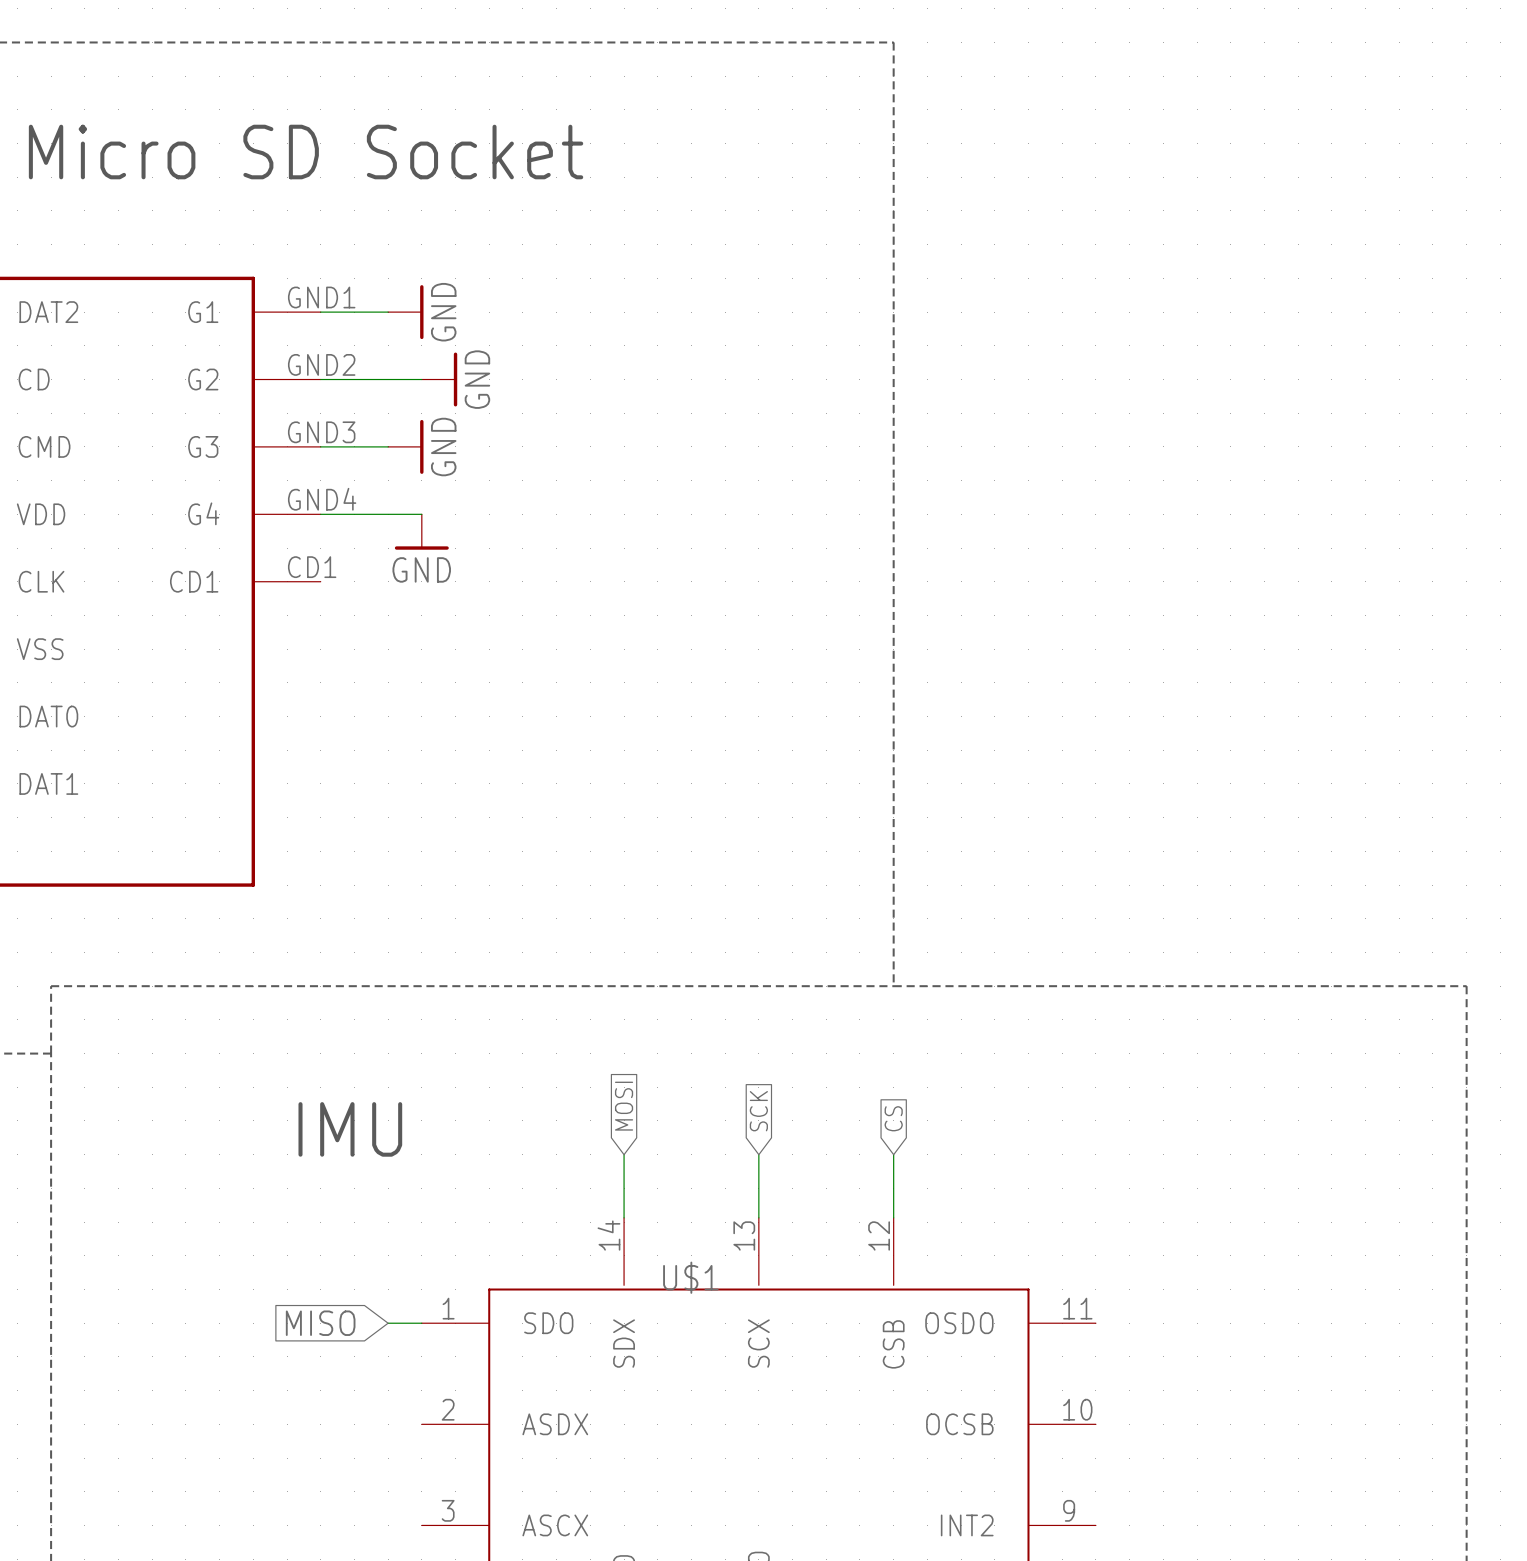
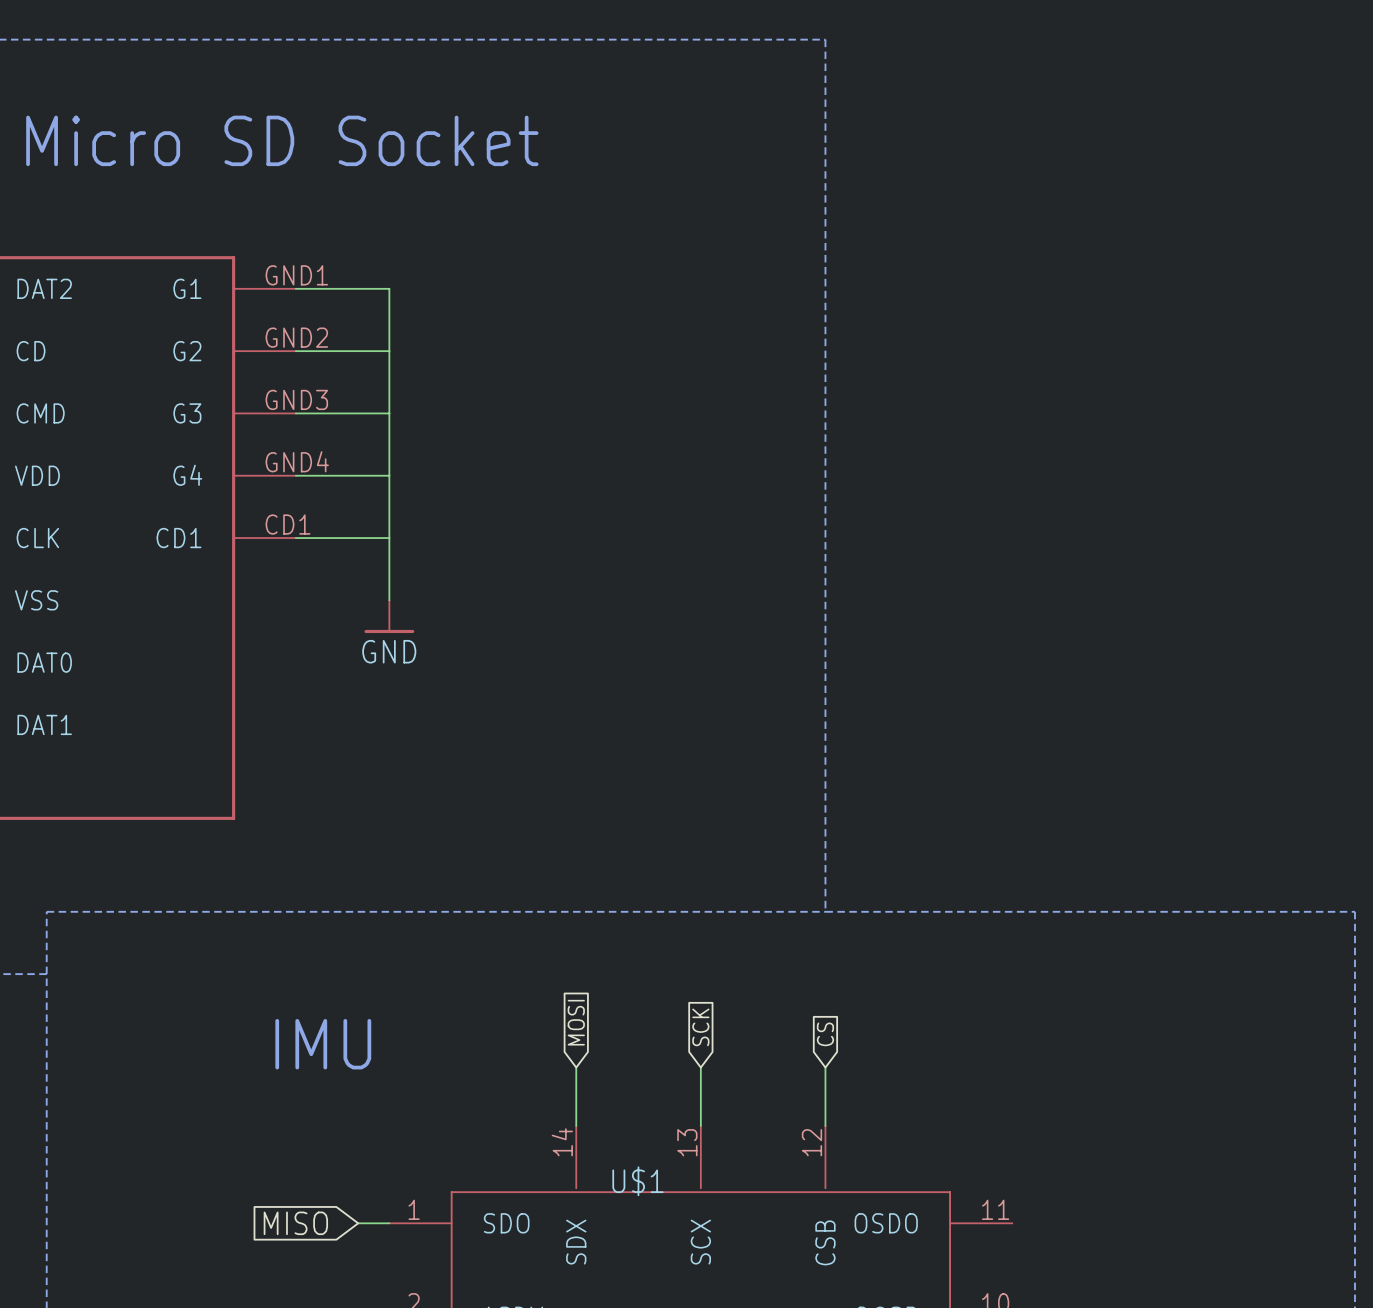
wire: none -> (358, 288) (389, 288) (389, 600)
power symbol: GND (405, 312) -> none
power symbol: GND (439, 379) -> none
power symbol: GND (405, 446) -> none
power symbol: GND (421, 532) -> none
wire: none -> (295, 538) (389, 538)
power symbol: none -> GND (389, 616)

